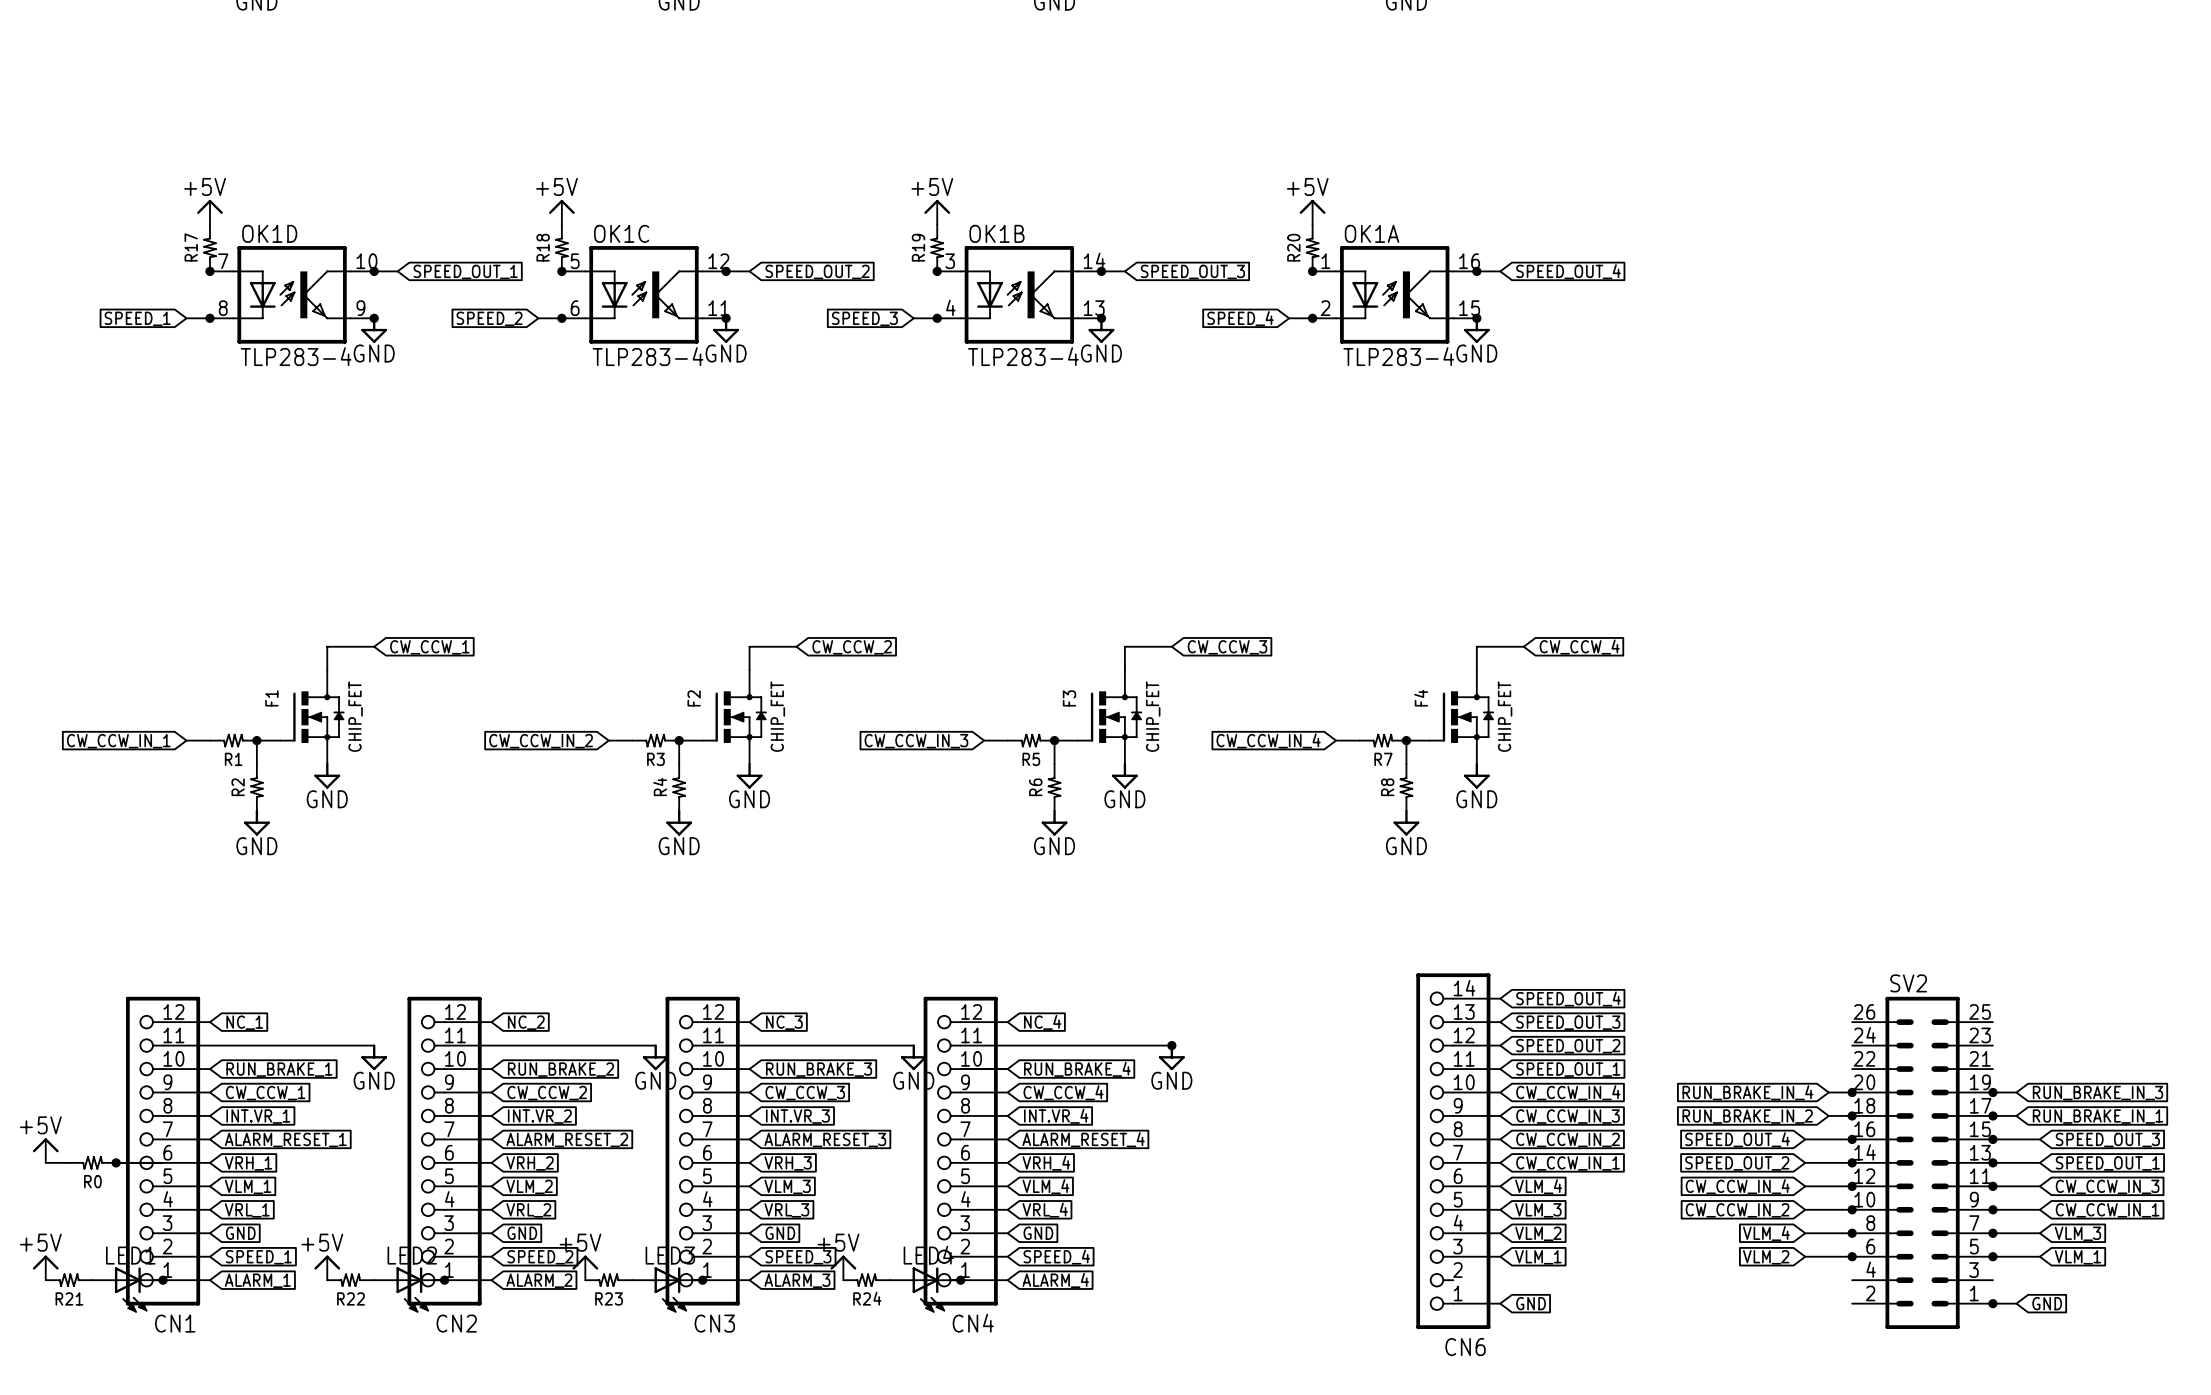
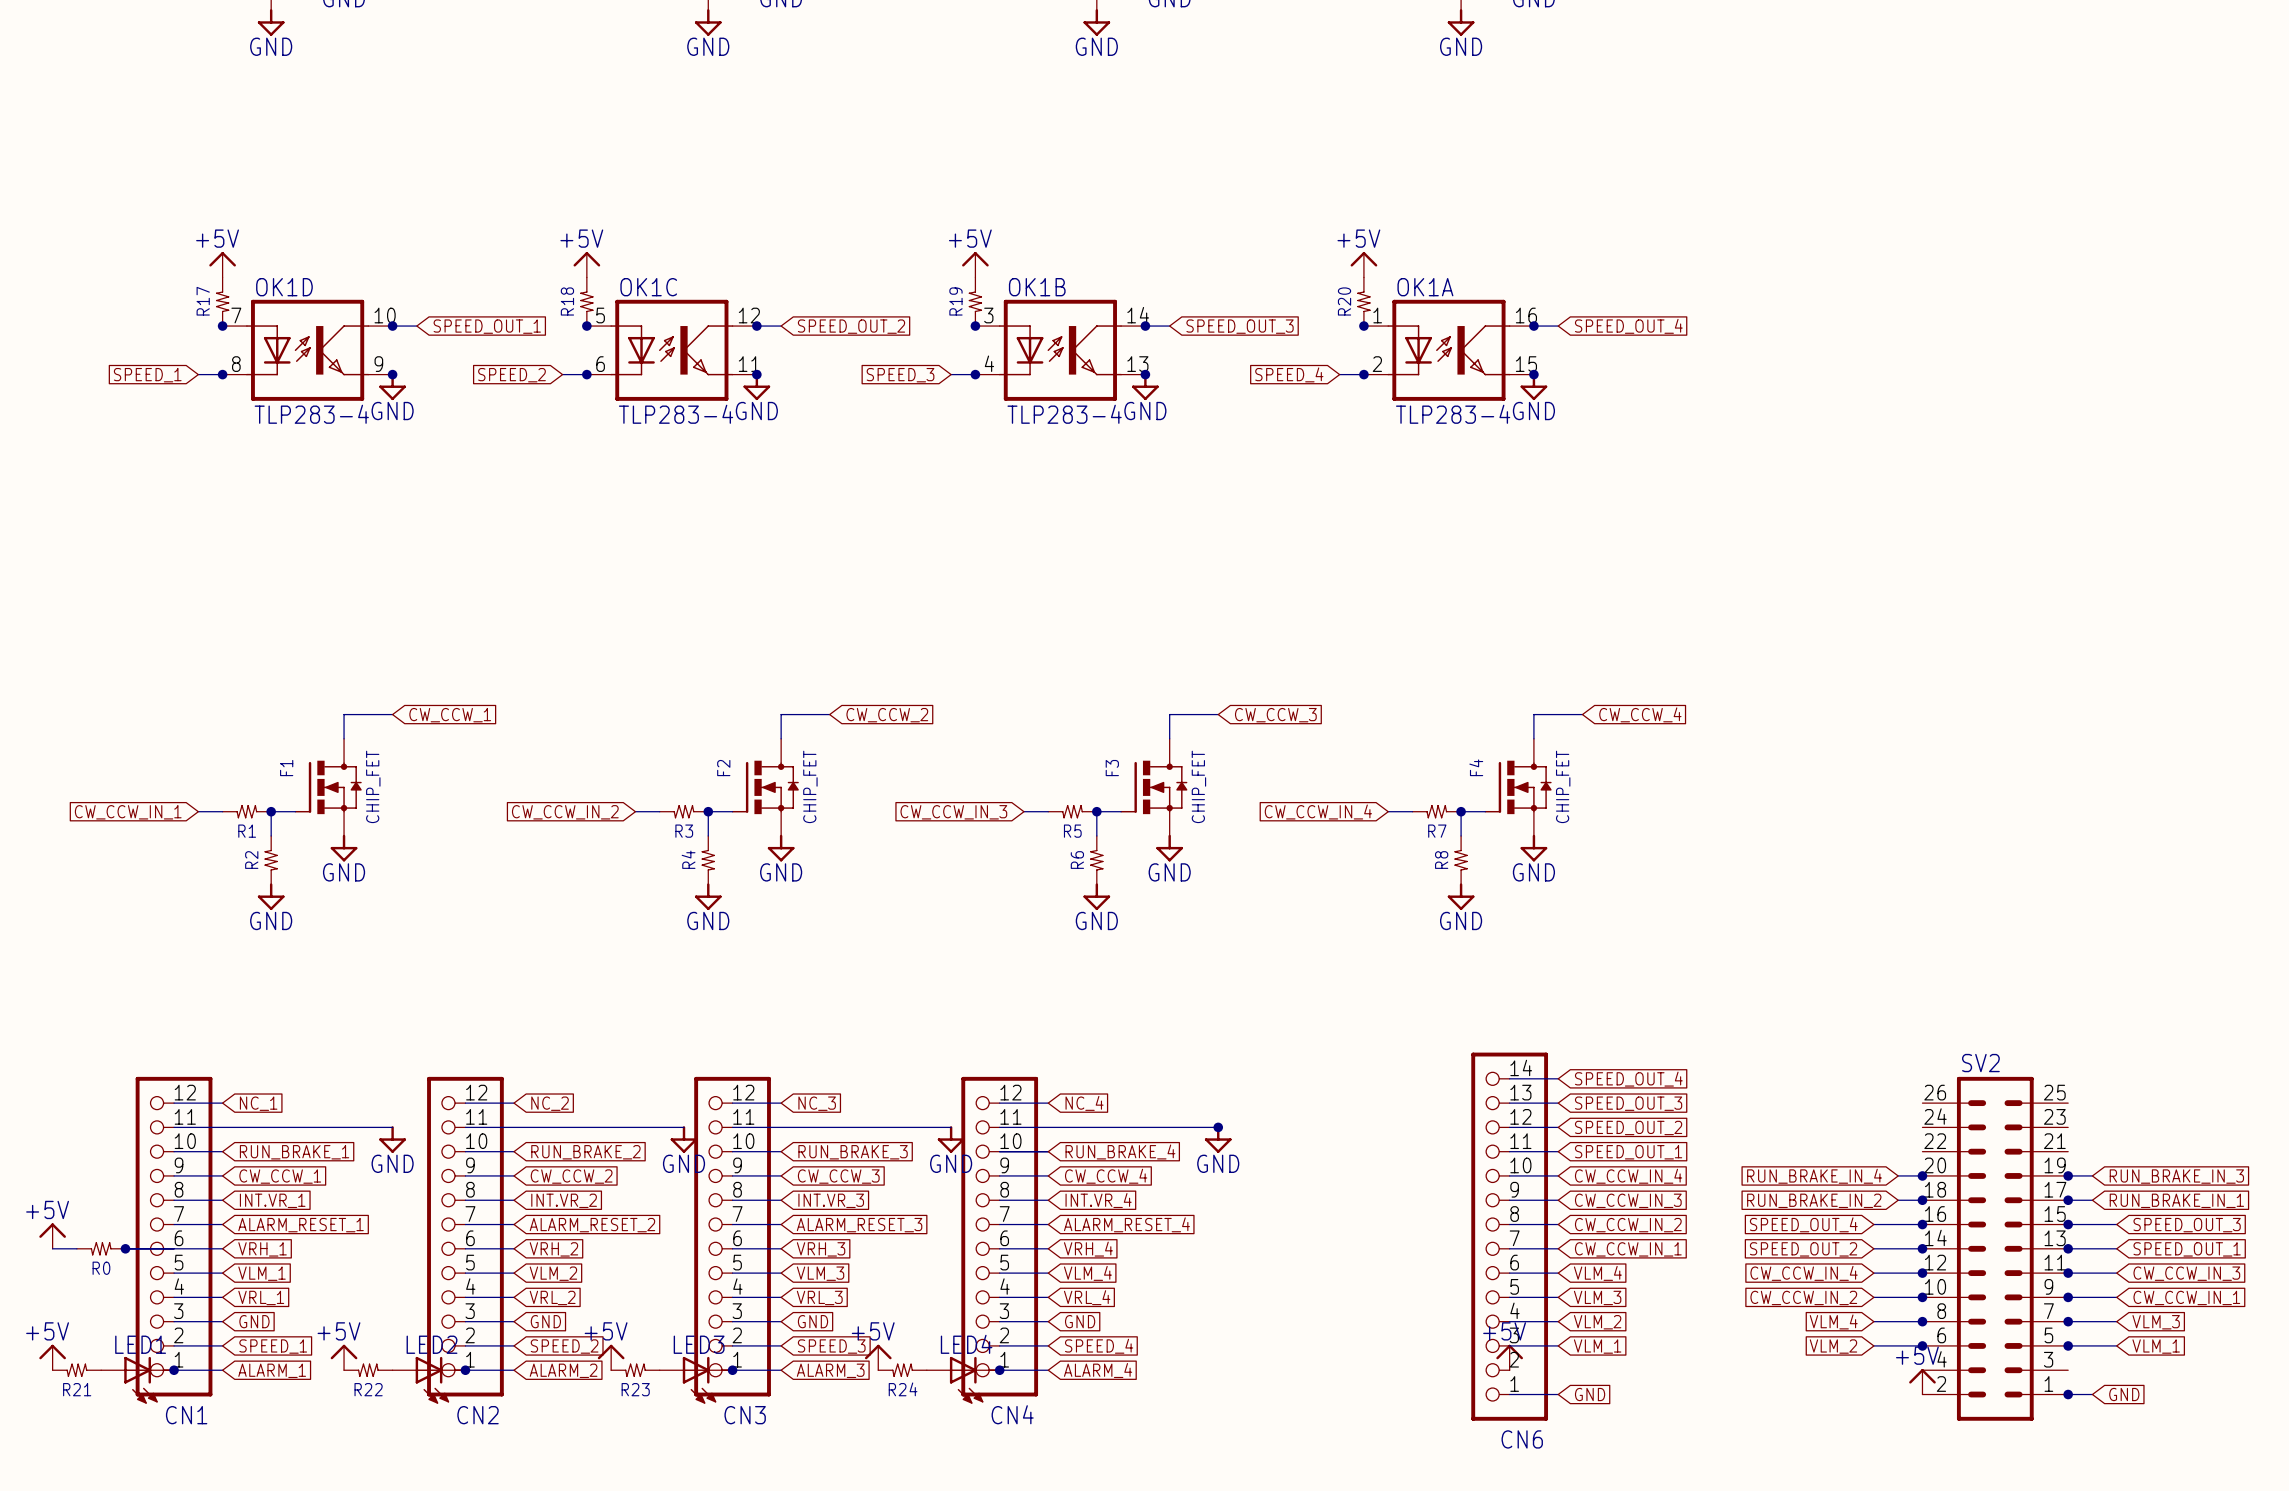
power symbol: none -> +5V (1509, 1357)
power symbol: none -> +5V (1922, 1381)

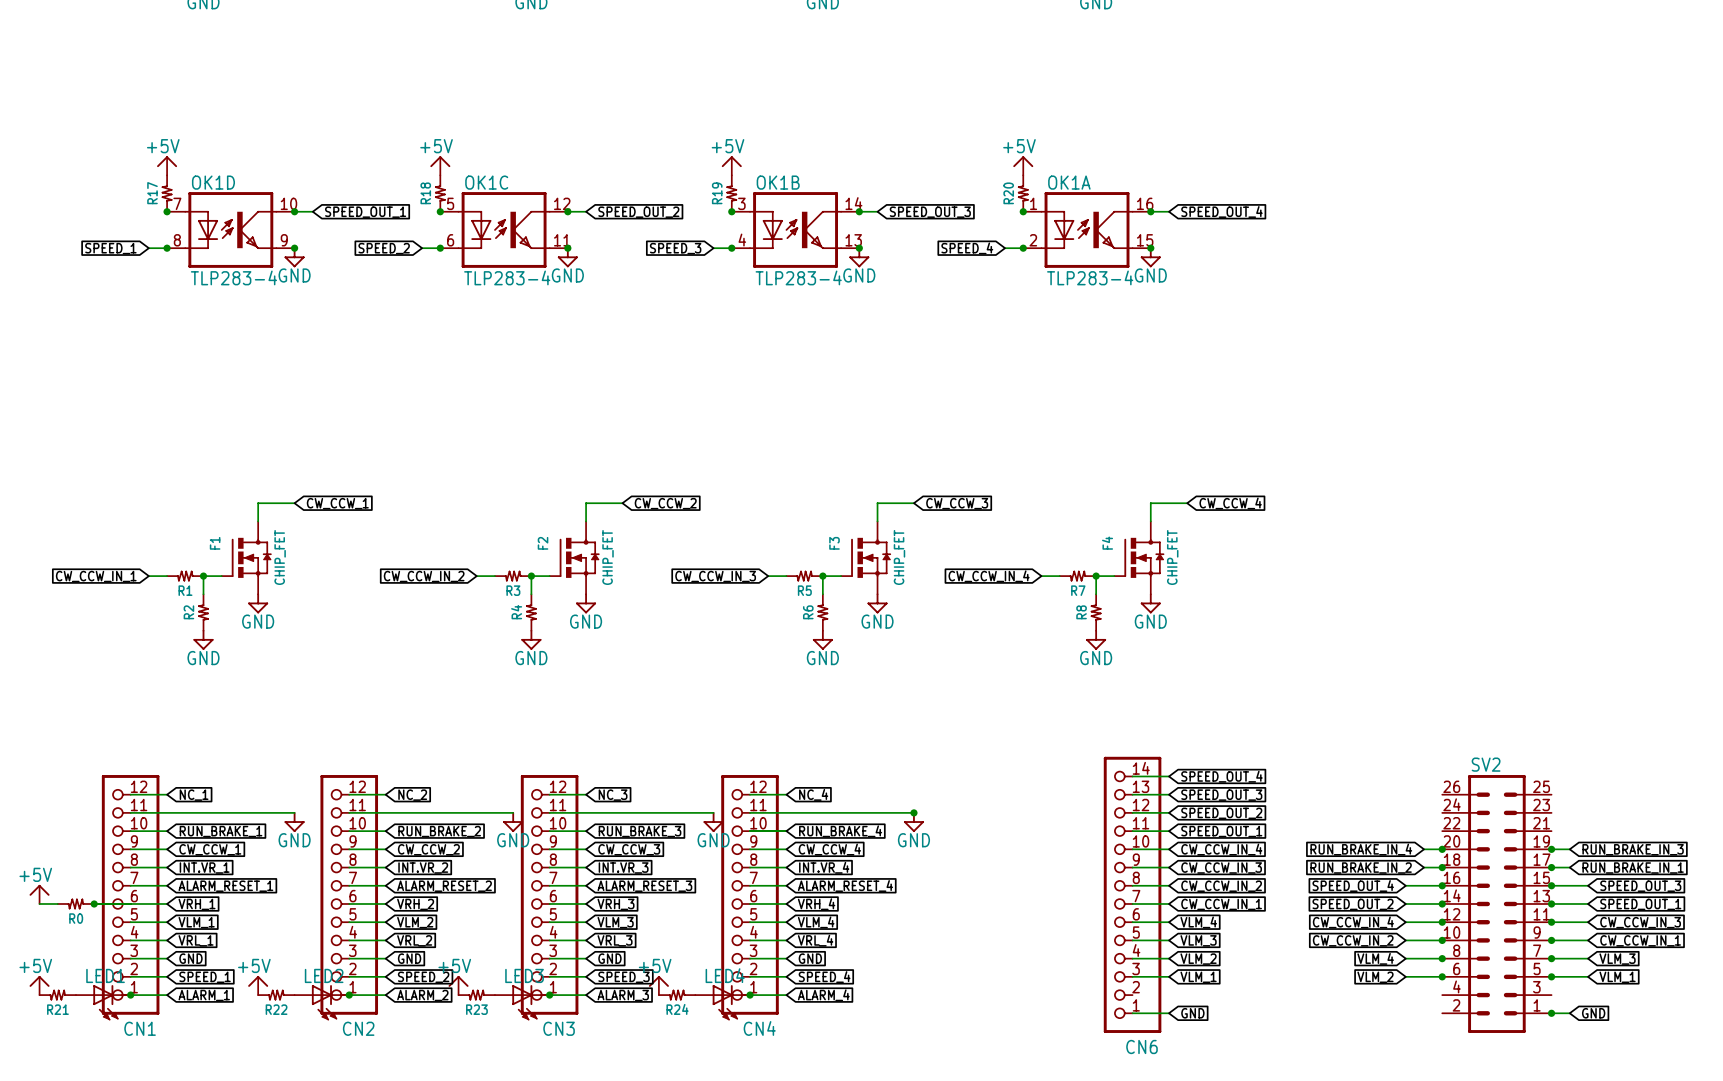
power symbol: +5V (1509, 1357) -> none
power symbol: +5V (1922, 1381) -> none

